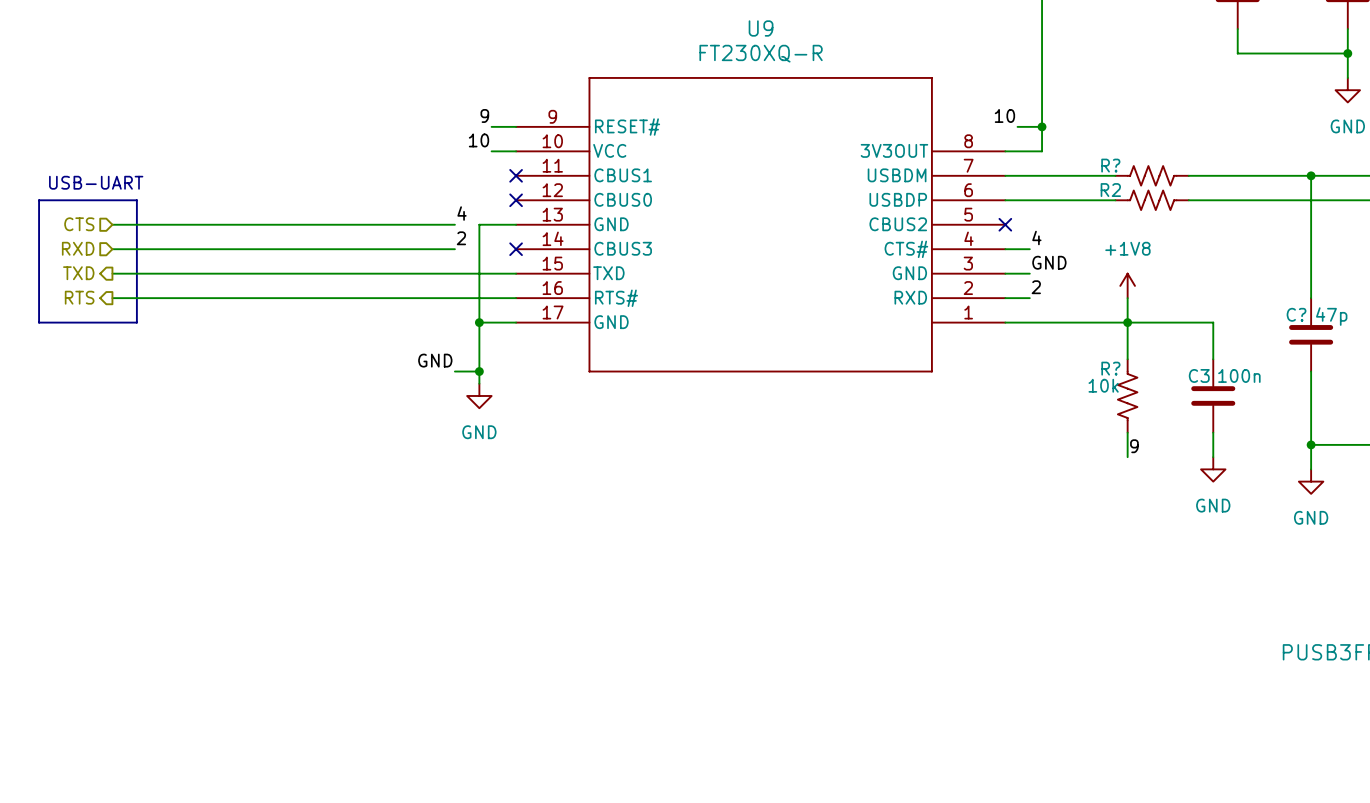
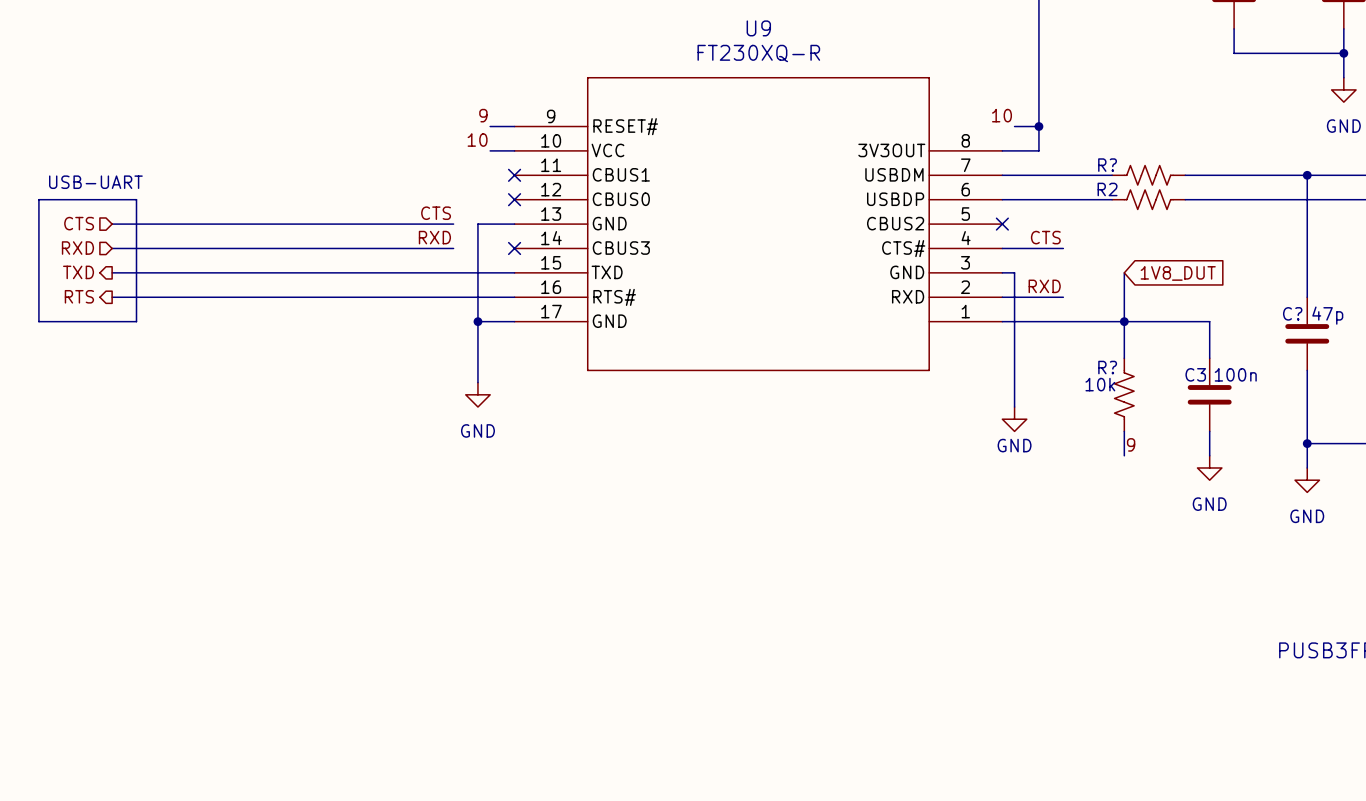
label: 4 (462, 213) -> CTS (436, 213)
label: 2 (461, 238) -> RXD (434, 237)
label: 4 (1036, 238) -> none
label: none -> CTS (1045, 237)
wire: none -> (1026, 248) (1063, 248)
label: GND (1049, 262) -> none
wire: (1017, 273) (1029, 273) -> (1014, 272) (1014, 407)
global label: none -> 1V8_DUT (1178, 273)
power symbol: +1V8 (1127, 285) -> none
label: 2 (1036, 287) -> none
label: none -> RXD (1044, 286)
wire: none -> (1026, 297) (1063, 297)
label: GND (435, 360) -> none
wire: (454, 371) (479, 371) -> none
junction: (479, 371) -> none
power symbol: none -> GND (1014, 419)

